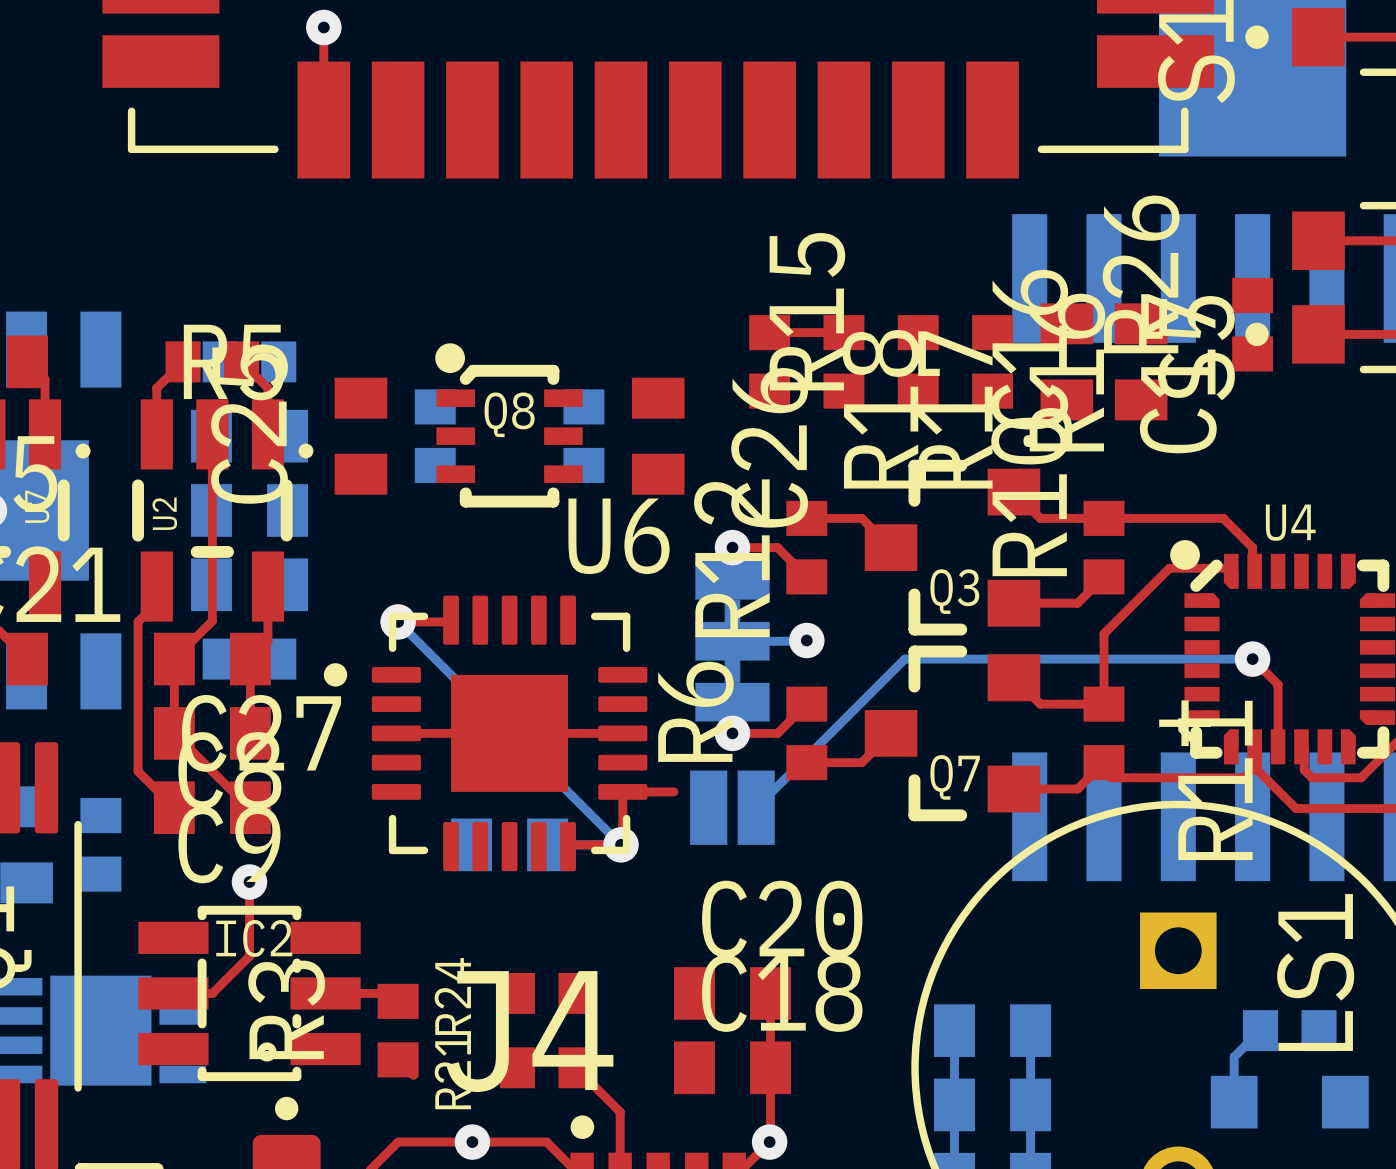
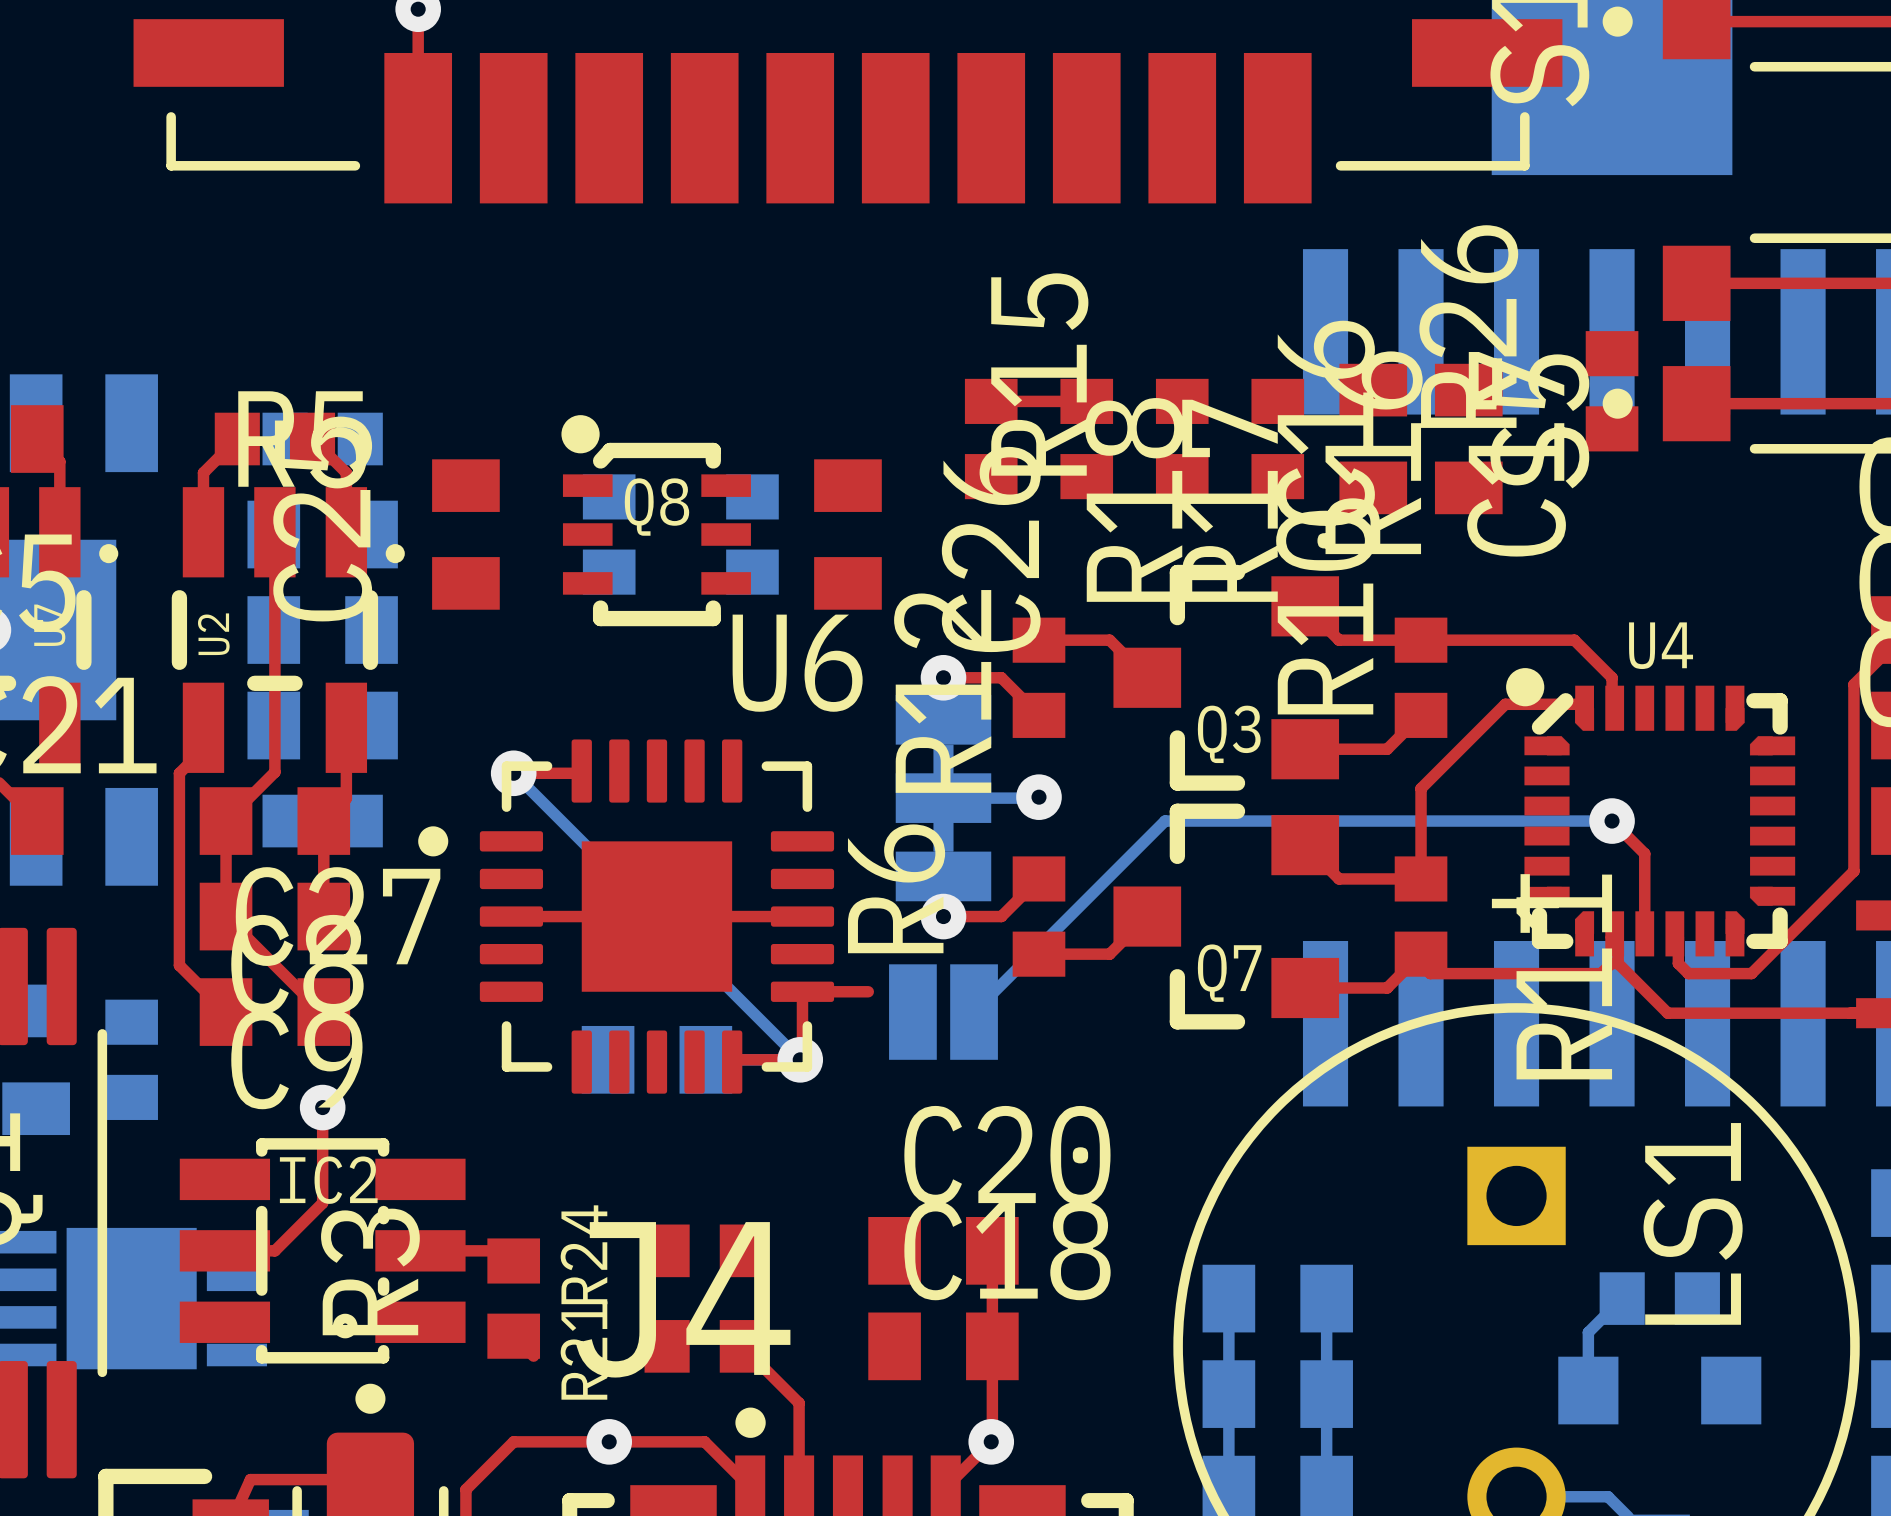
part position: (435, 436) -> (609, 534)

